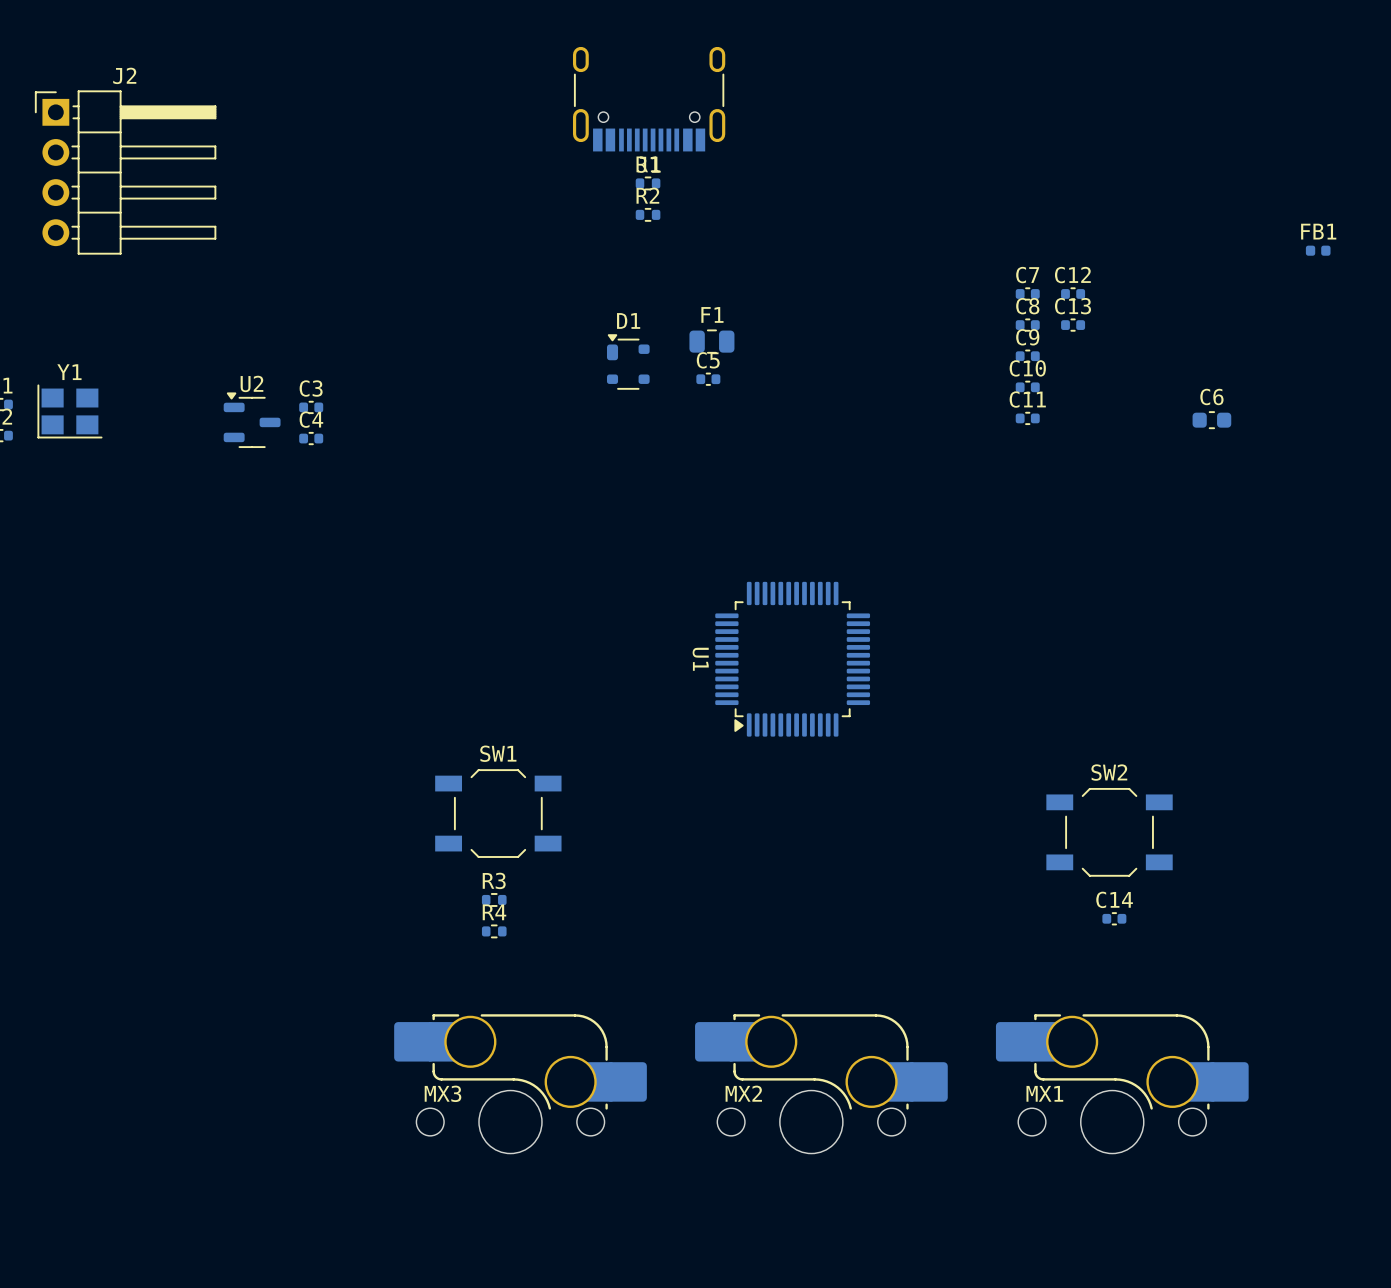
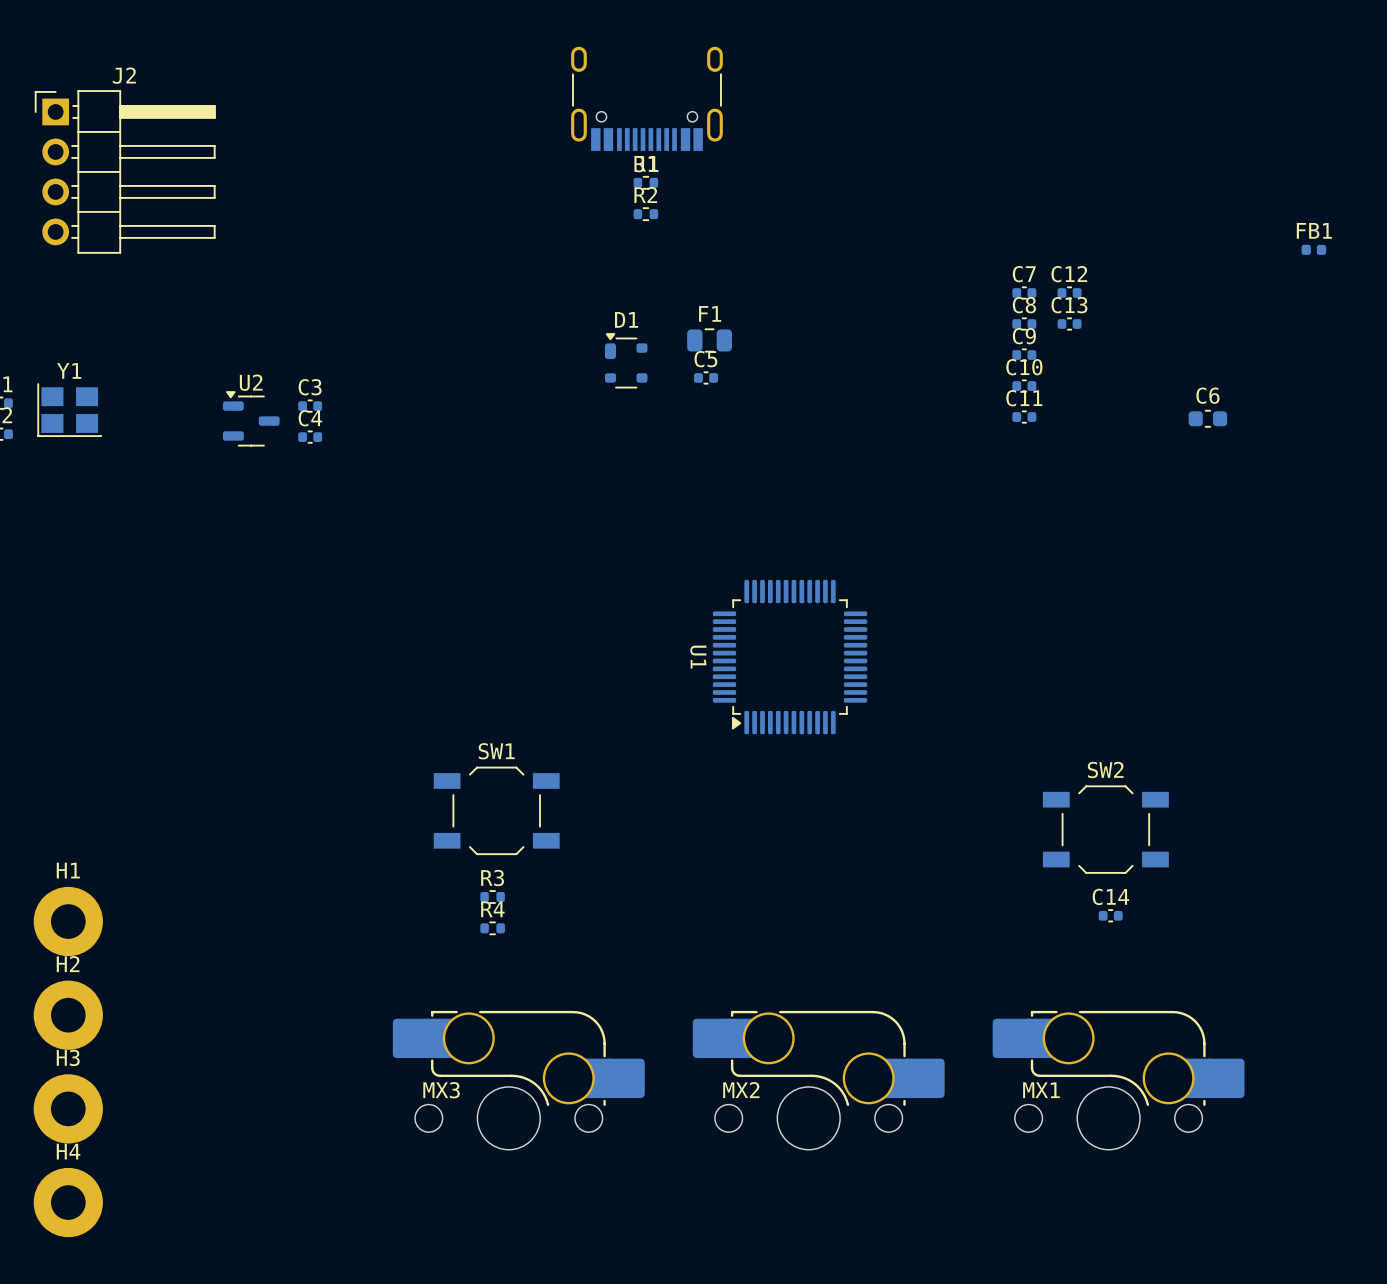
H1: none -> (68, 921)
H2: none -> (68, 1015)
H3: none -> (68, 1108)
H4: none -> (68, 1202)

